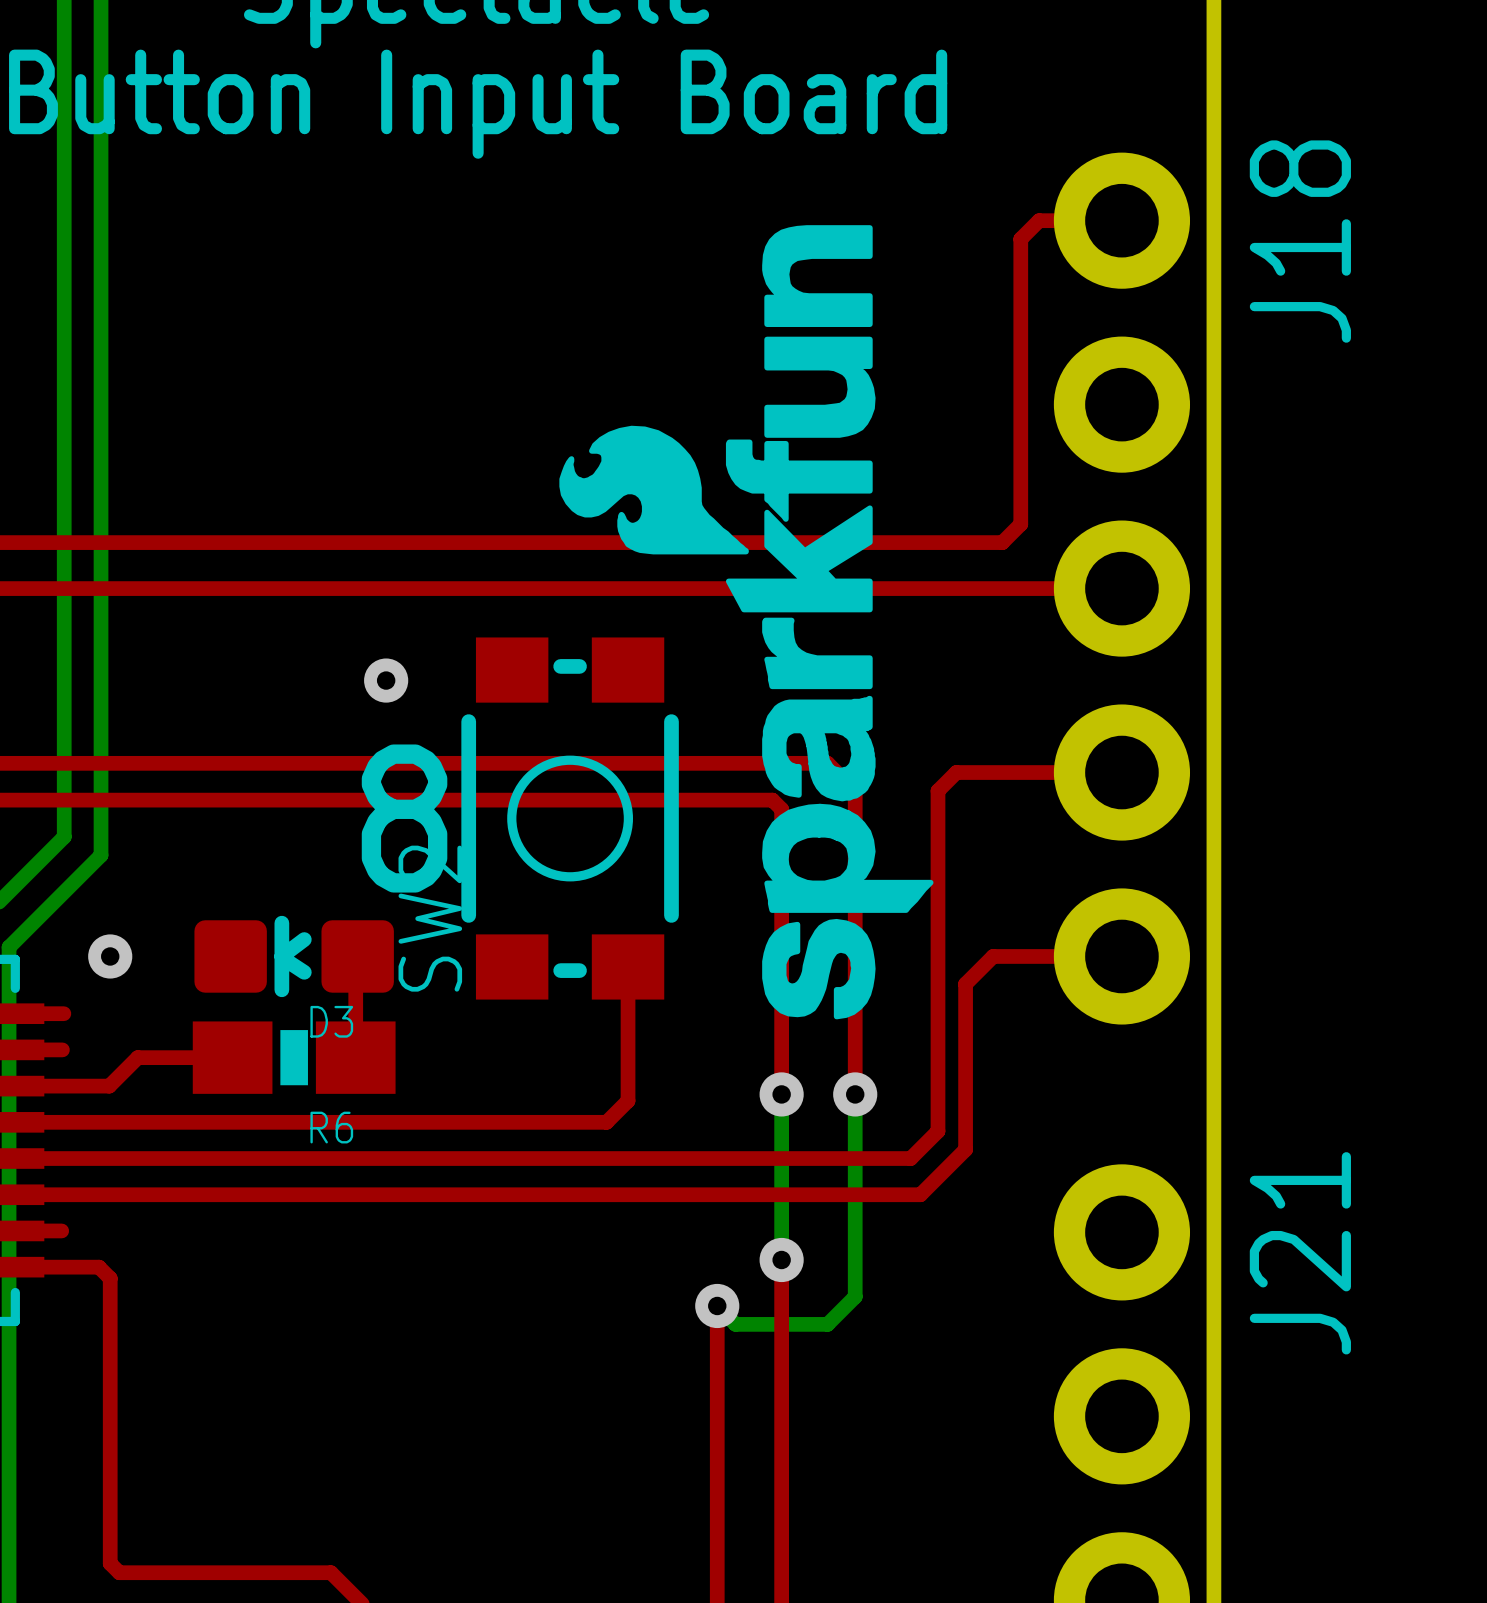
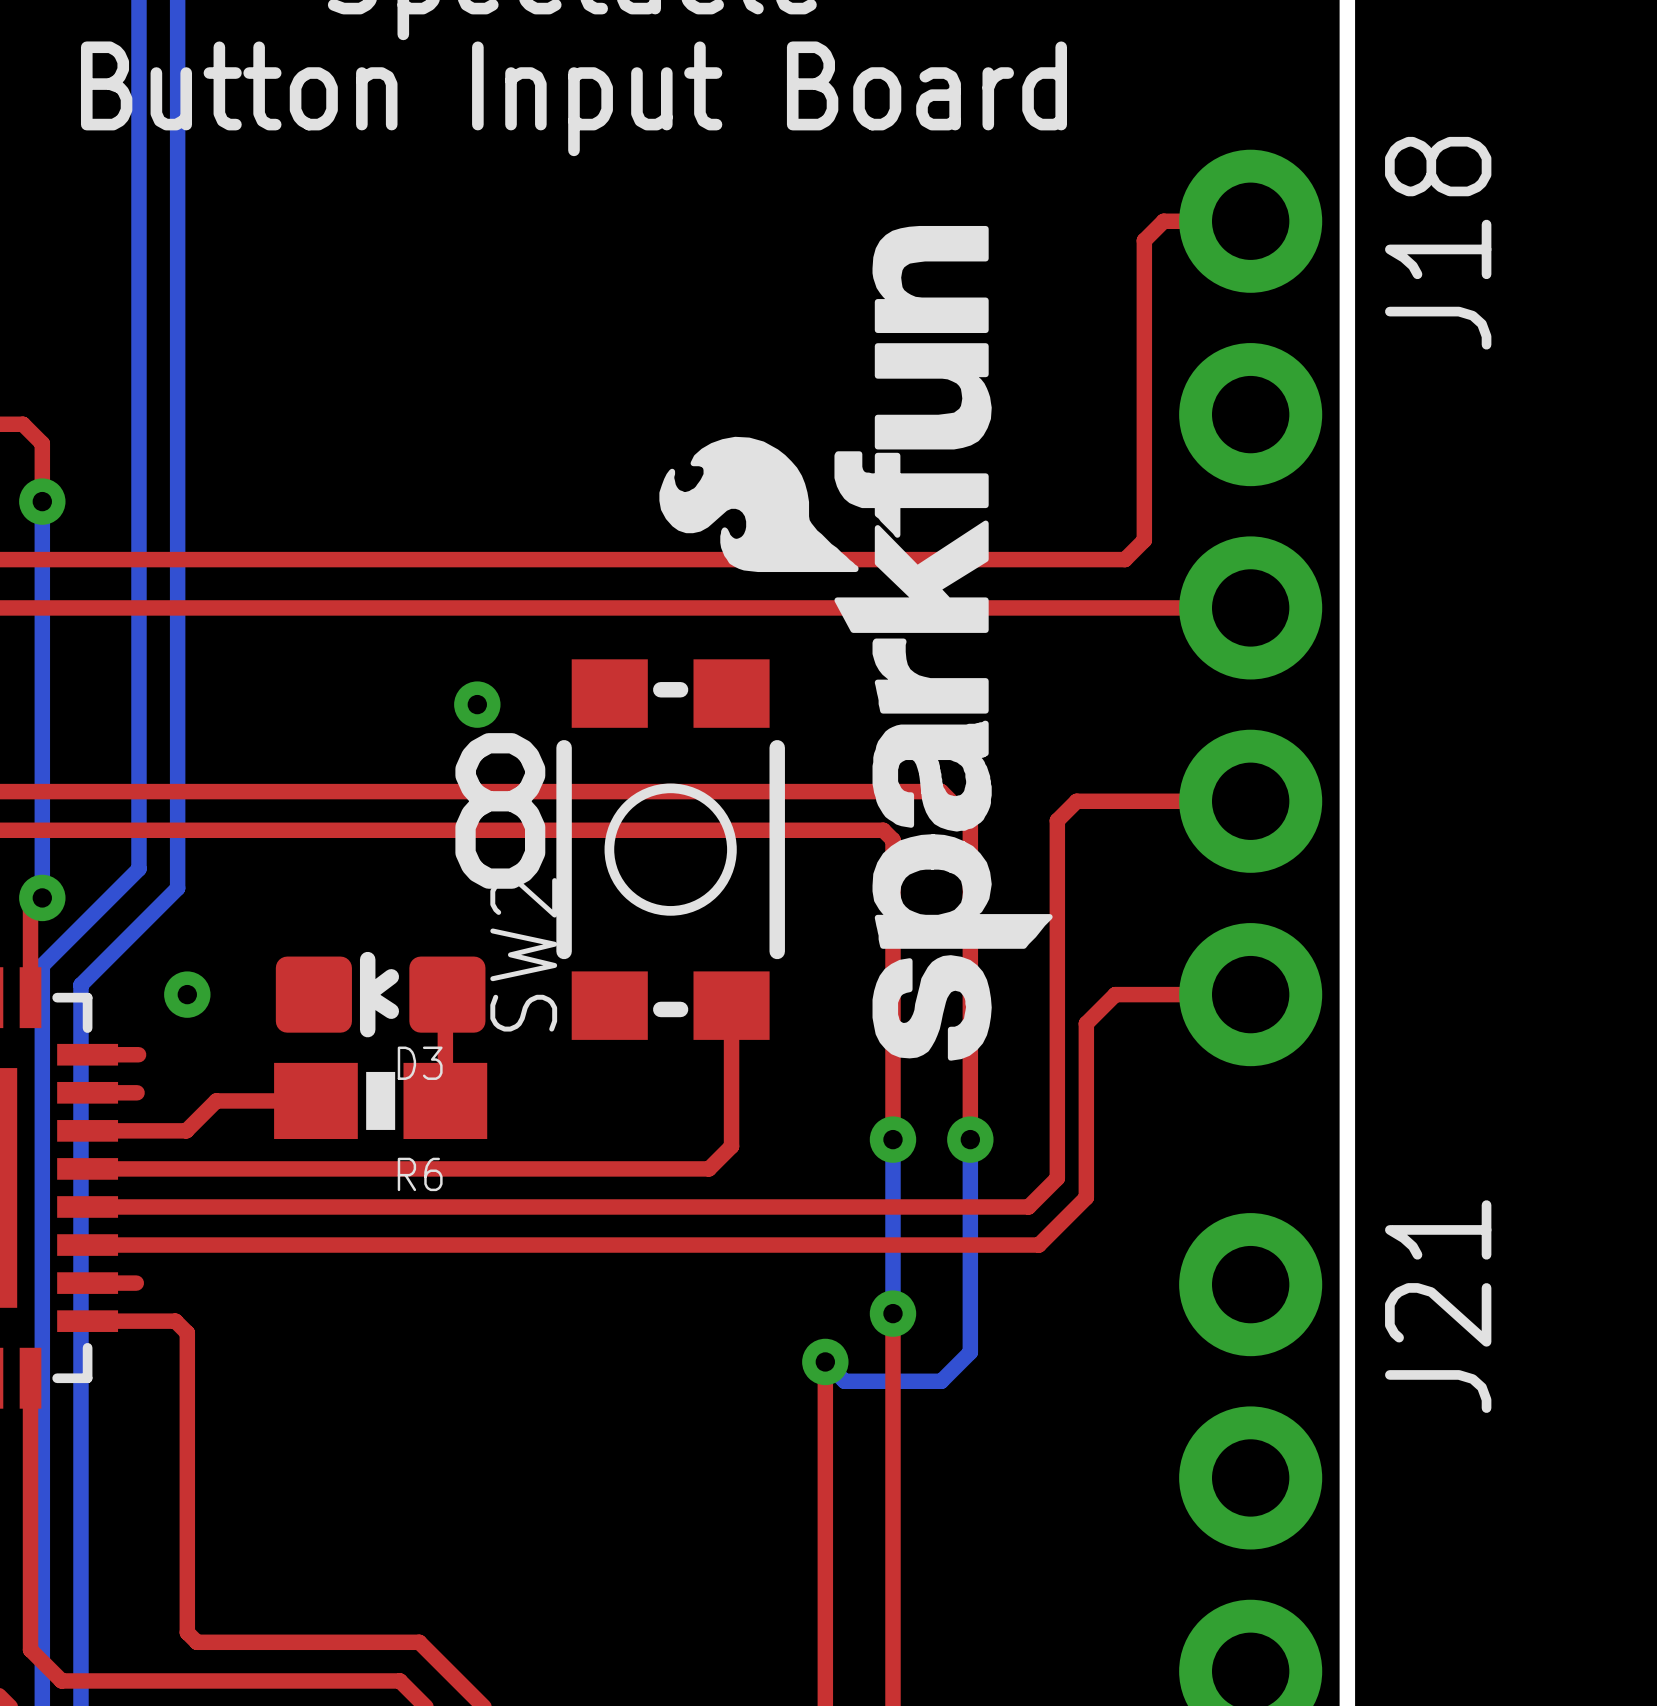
text position: 8 (404, 818) -> 8 (500, 810)

